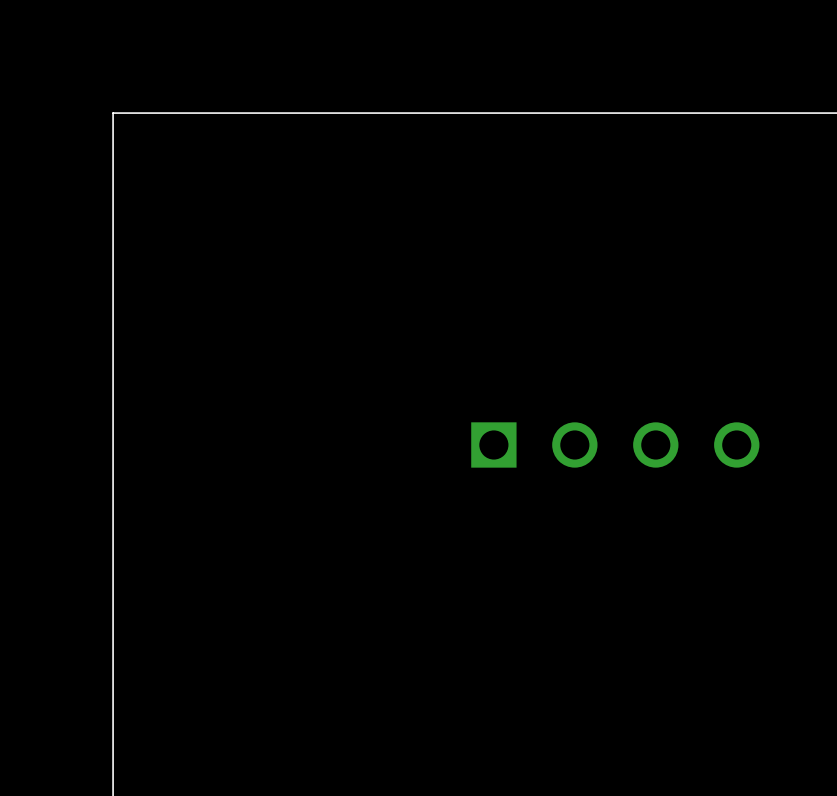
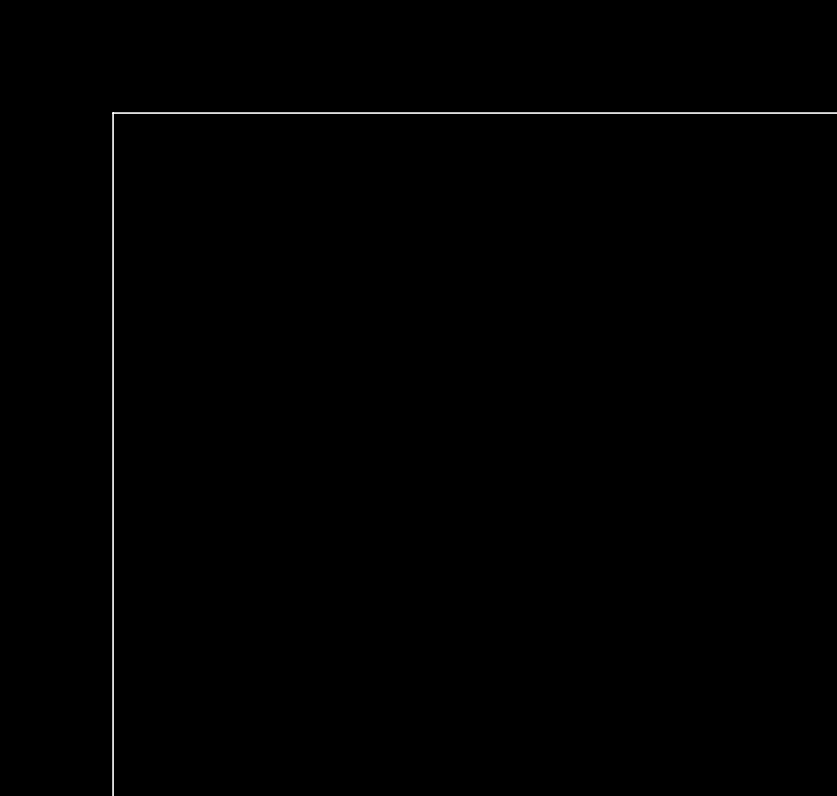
part: (615, 444) -> none

